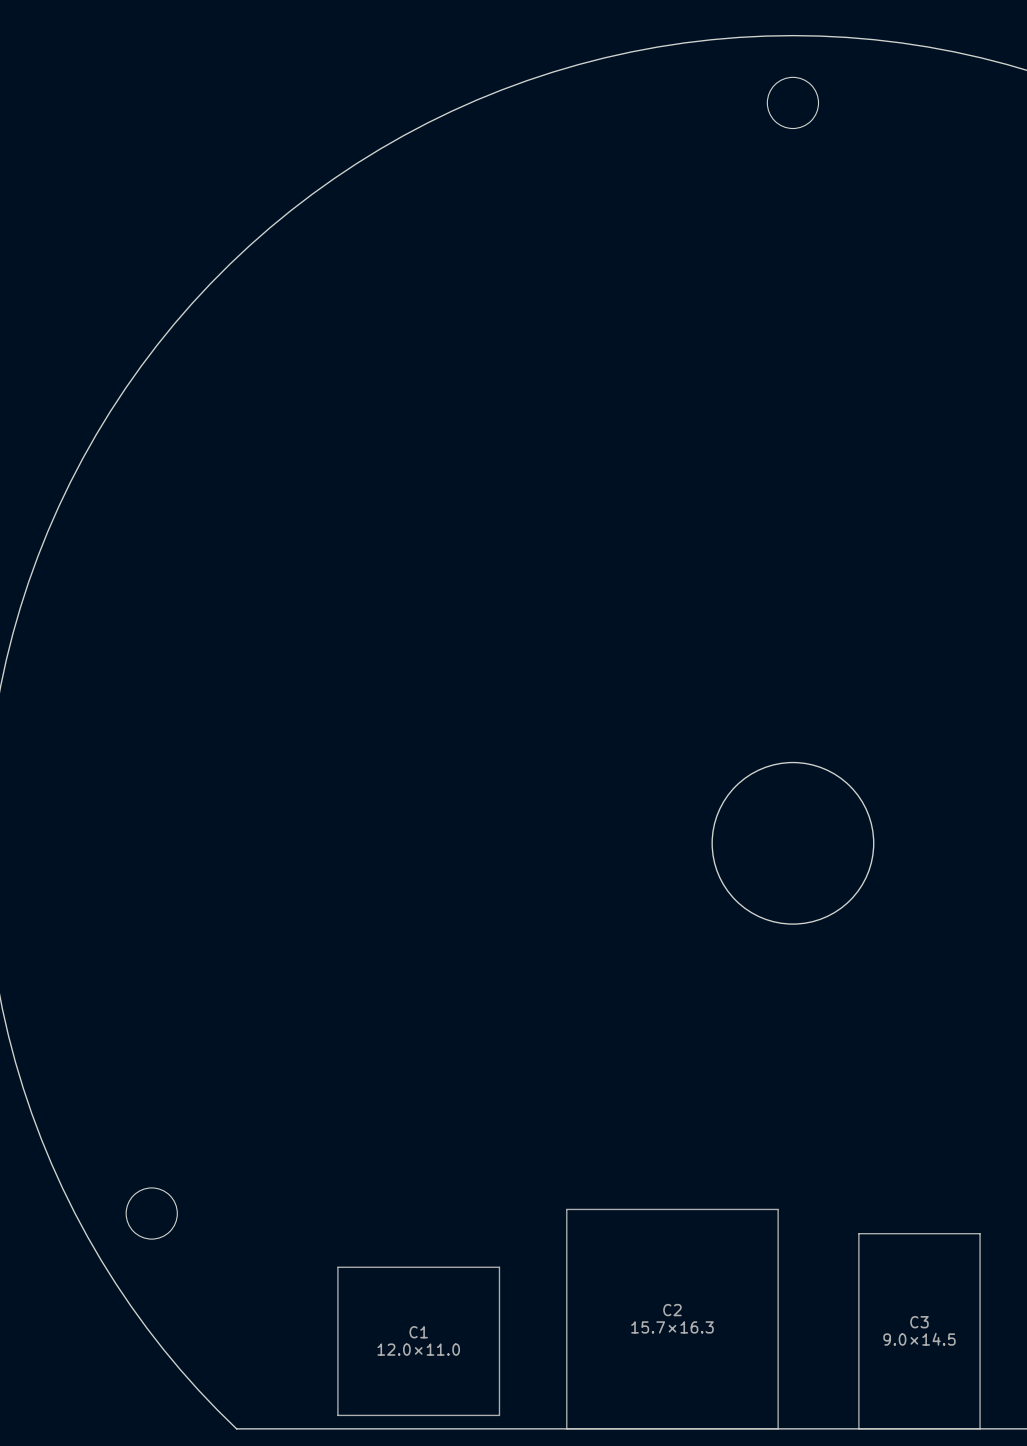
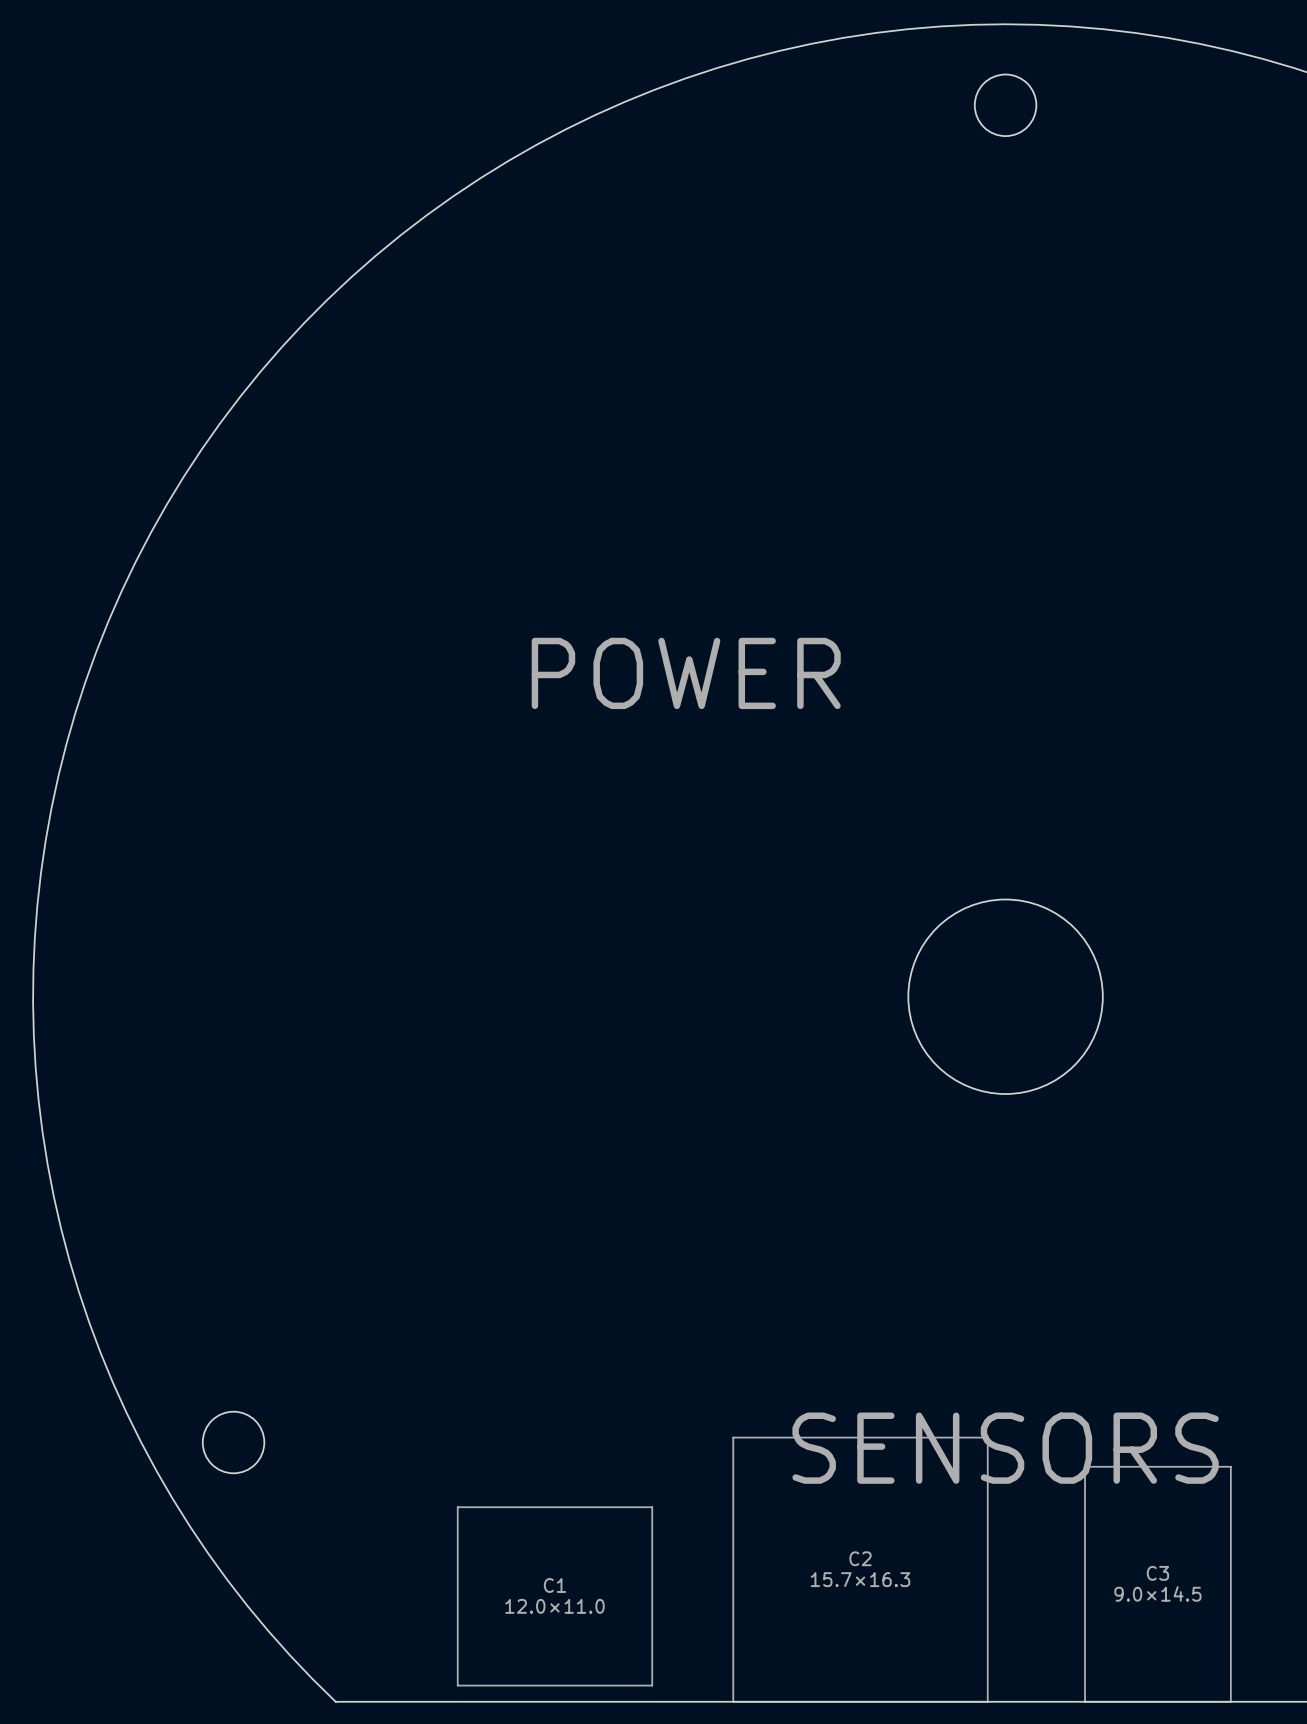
text: none -> POWER (686, 673)
text: none -> SENSORS (1005, 1448)

